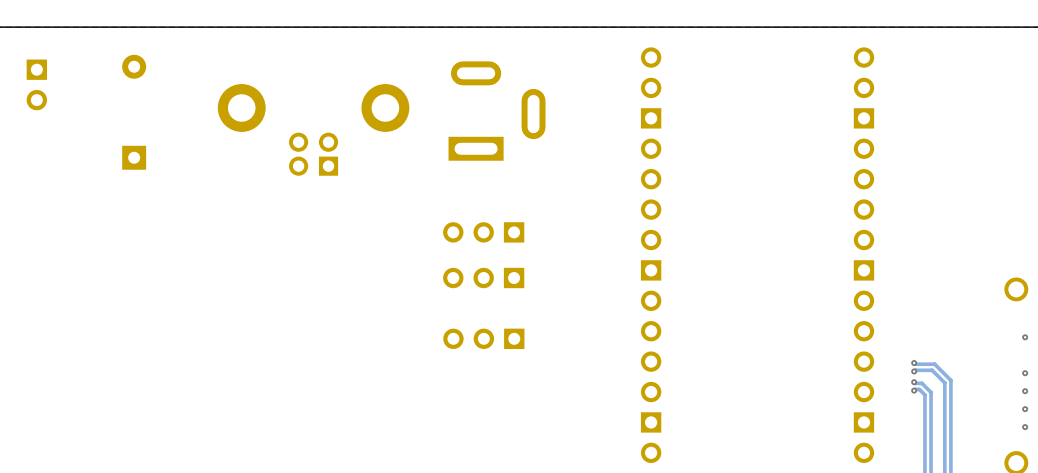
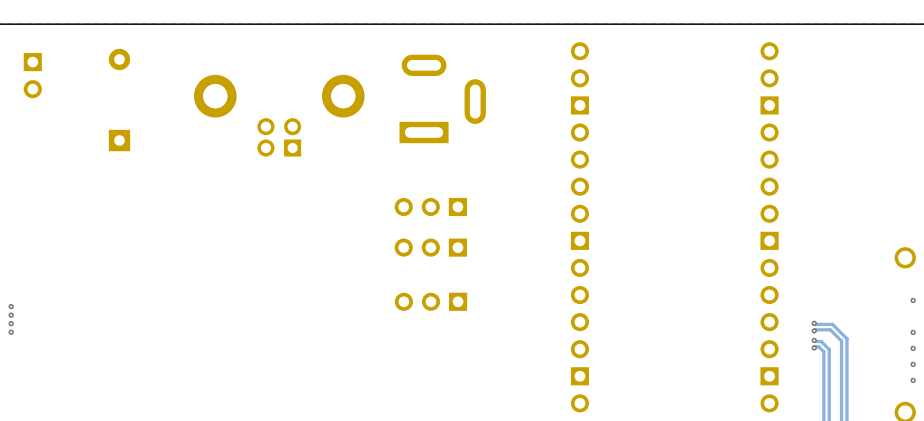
via: none -> (11, 306)
via: none -> (11, 315)
via: none -> (11, 323)
via: none -> (11, 332)

